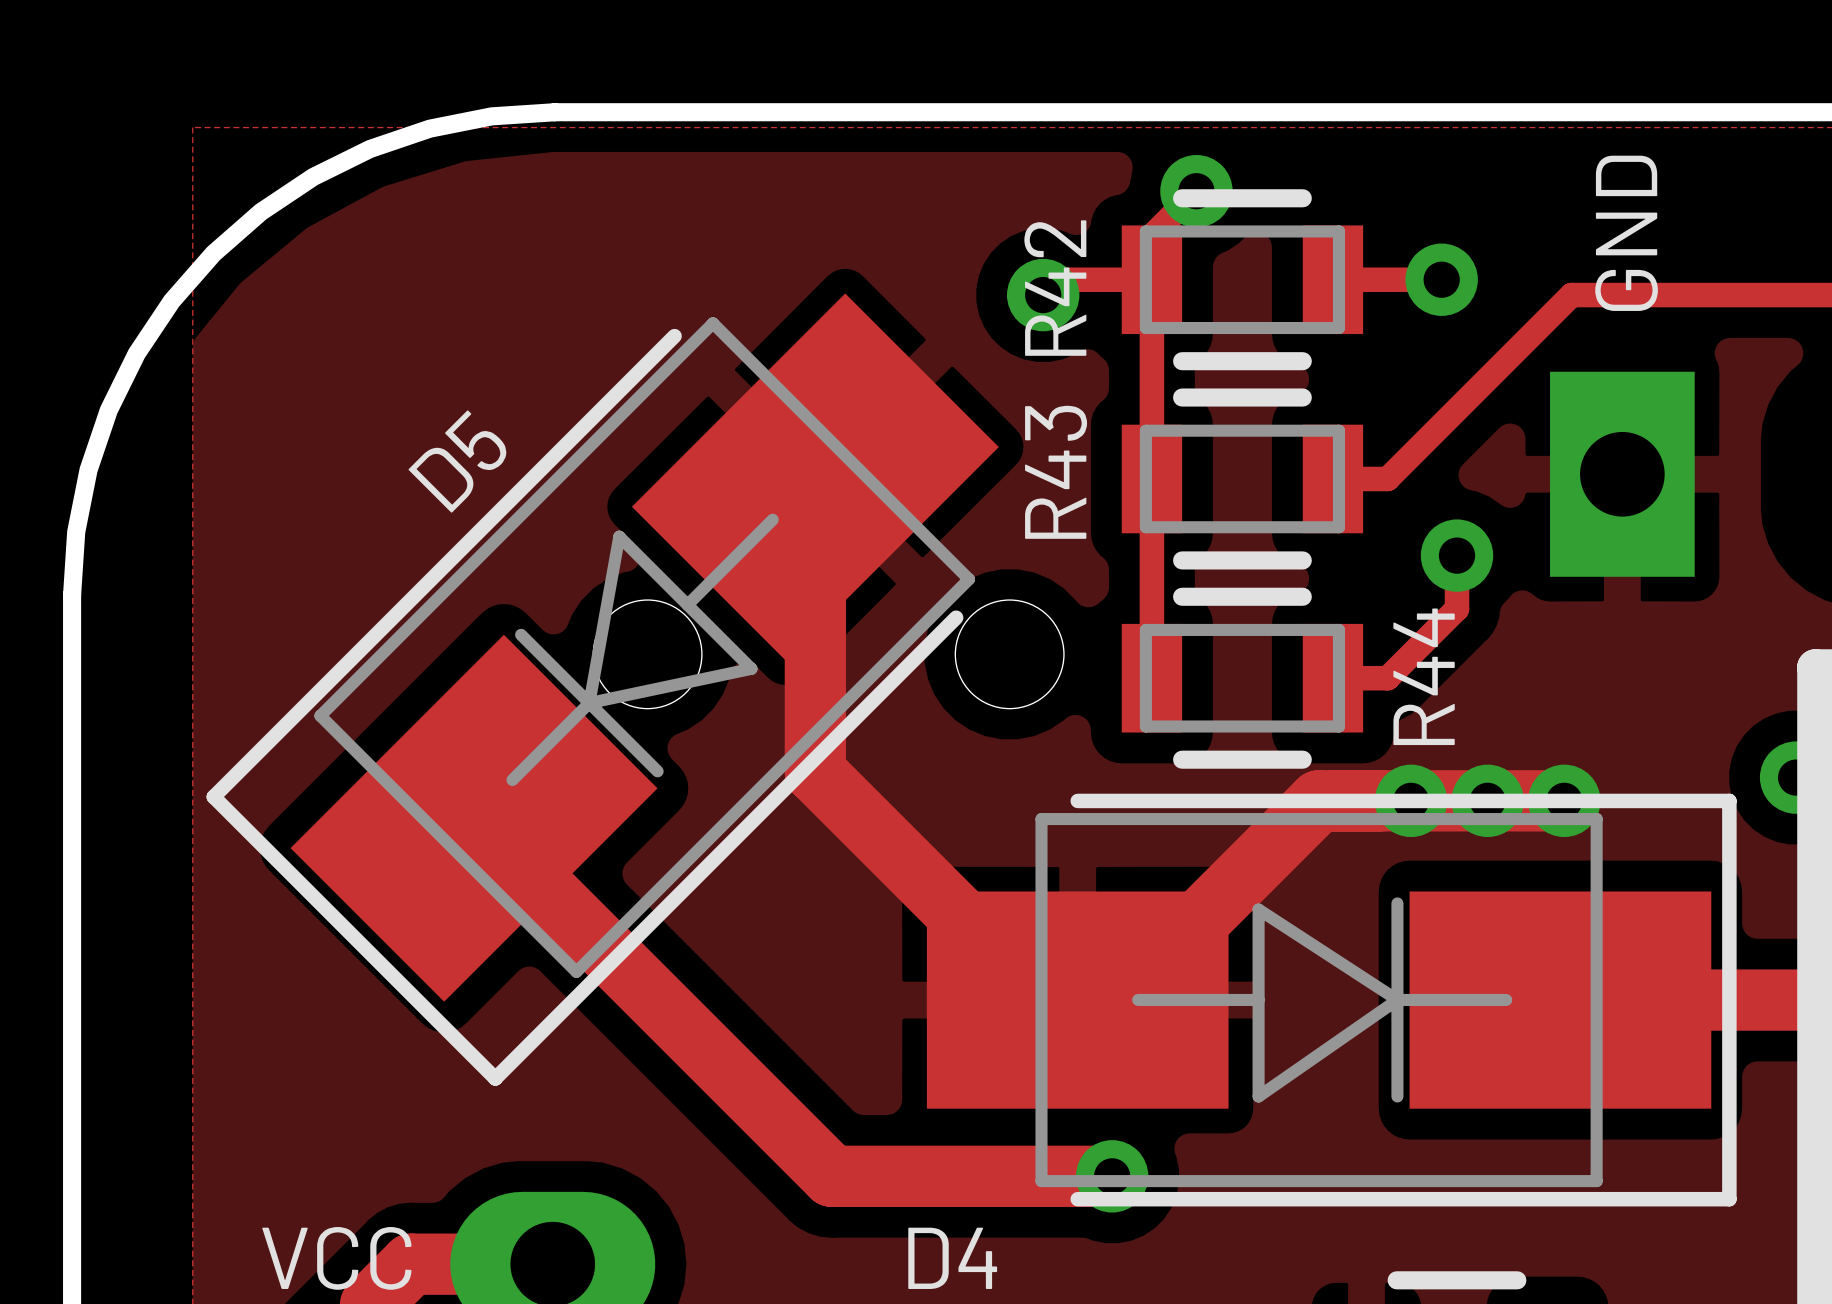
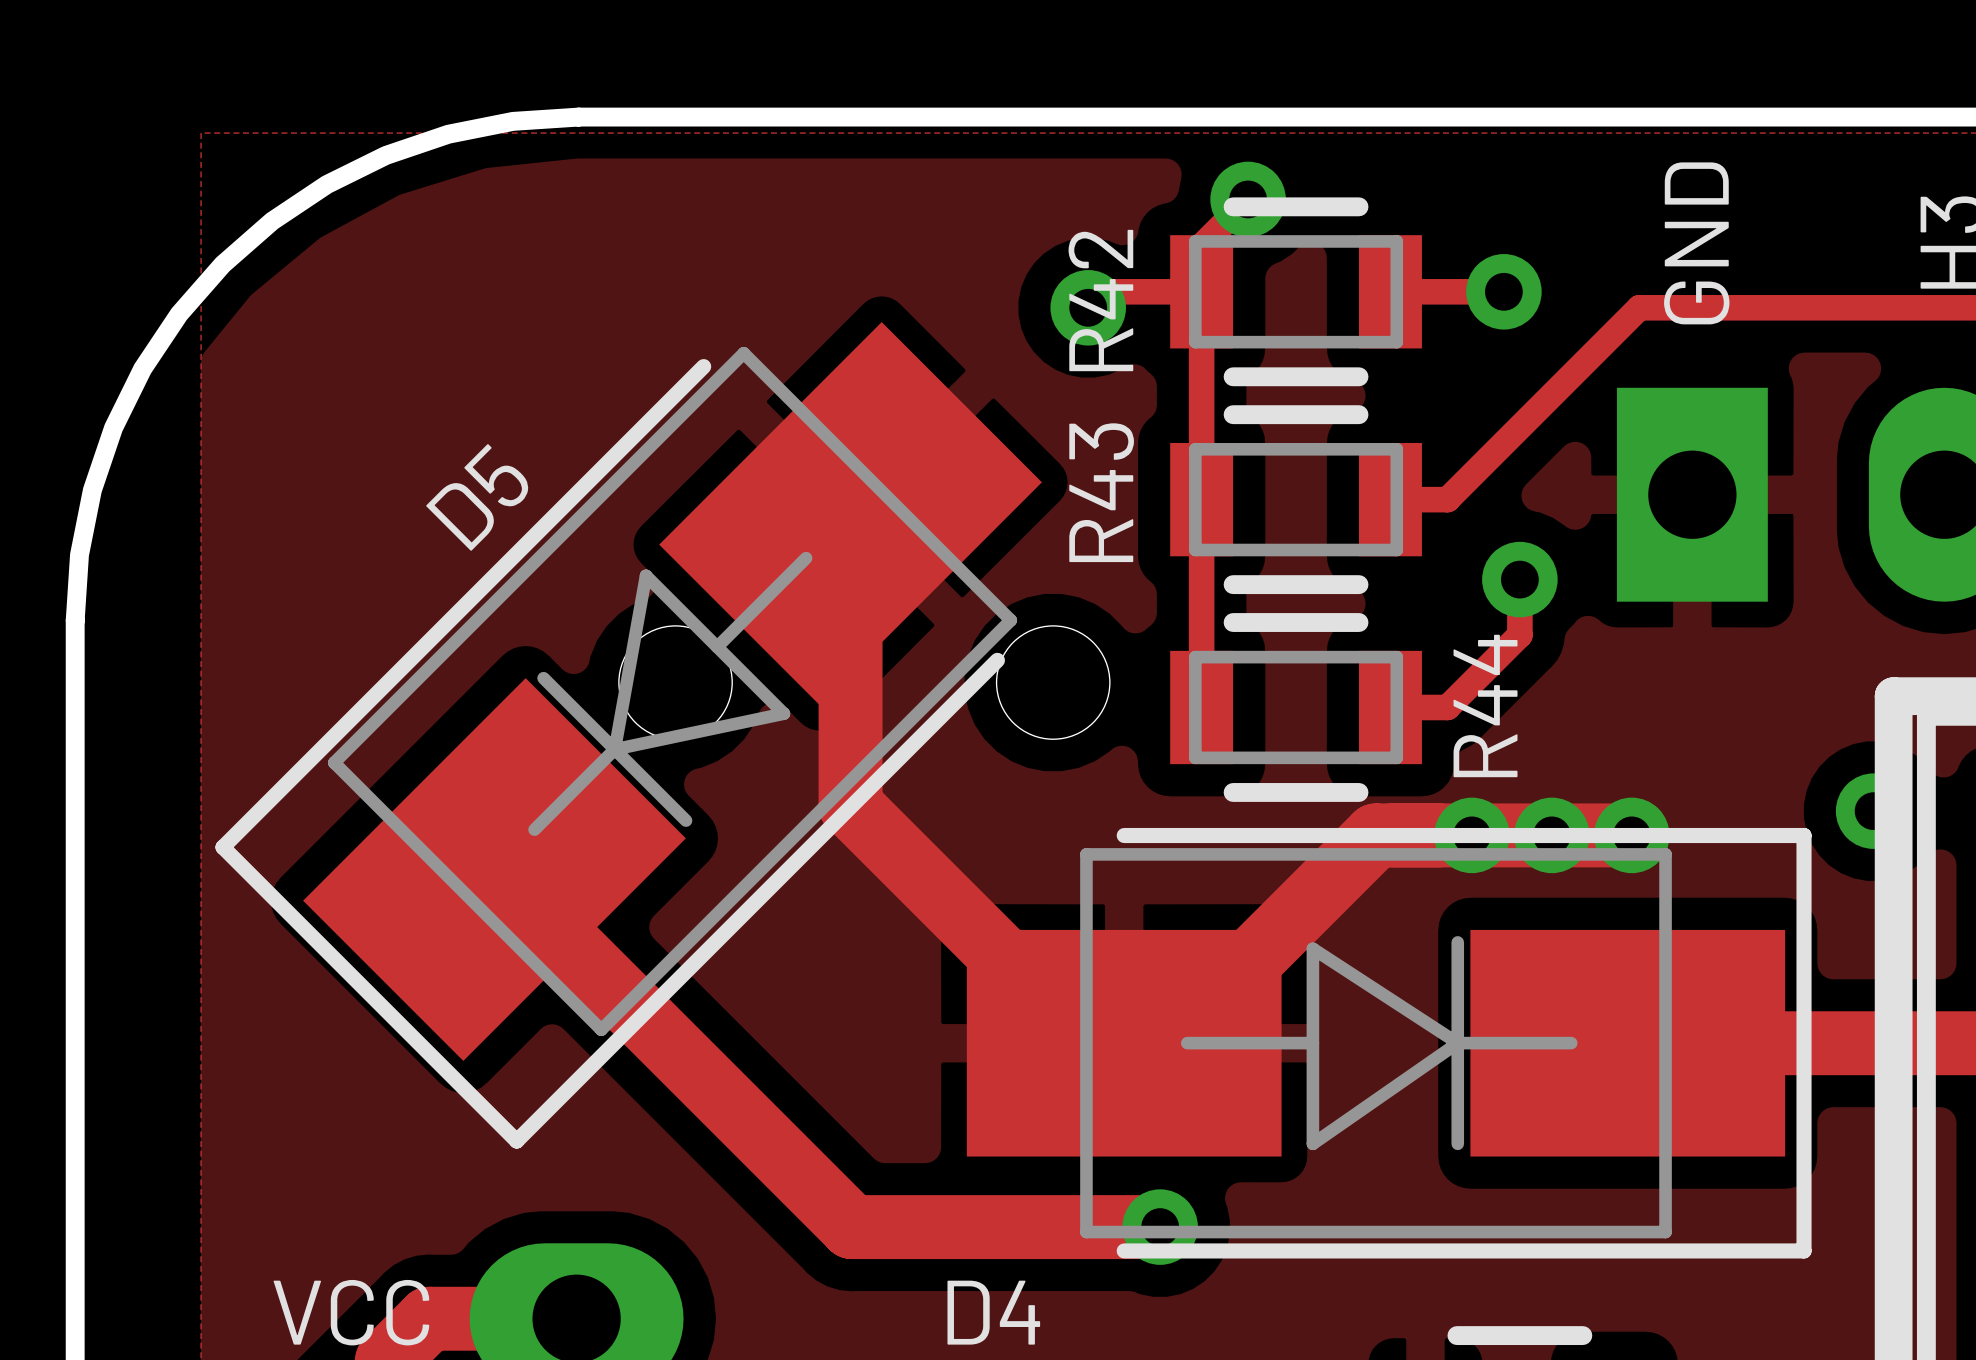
D5 position: (602, 689) -> (628, 735)
track: (474, 818) (832, 1176) -> (494, 869) (852, 1227) (868, 1227)

